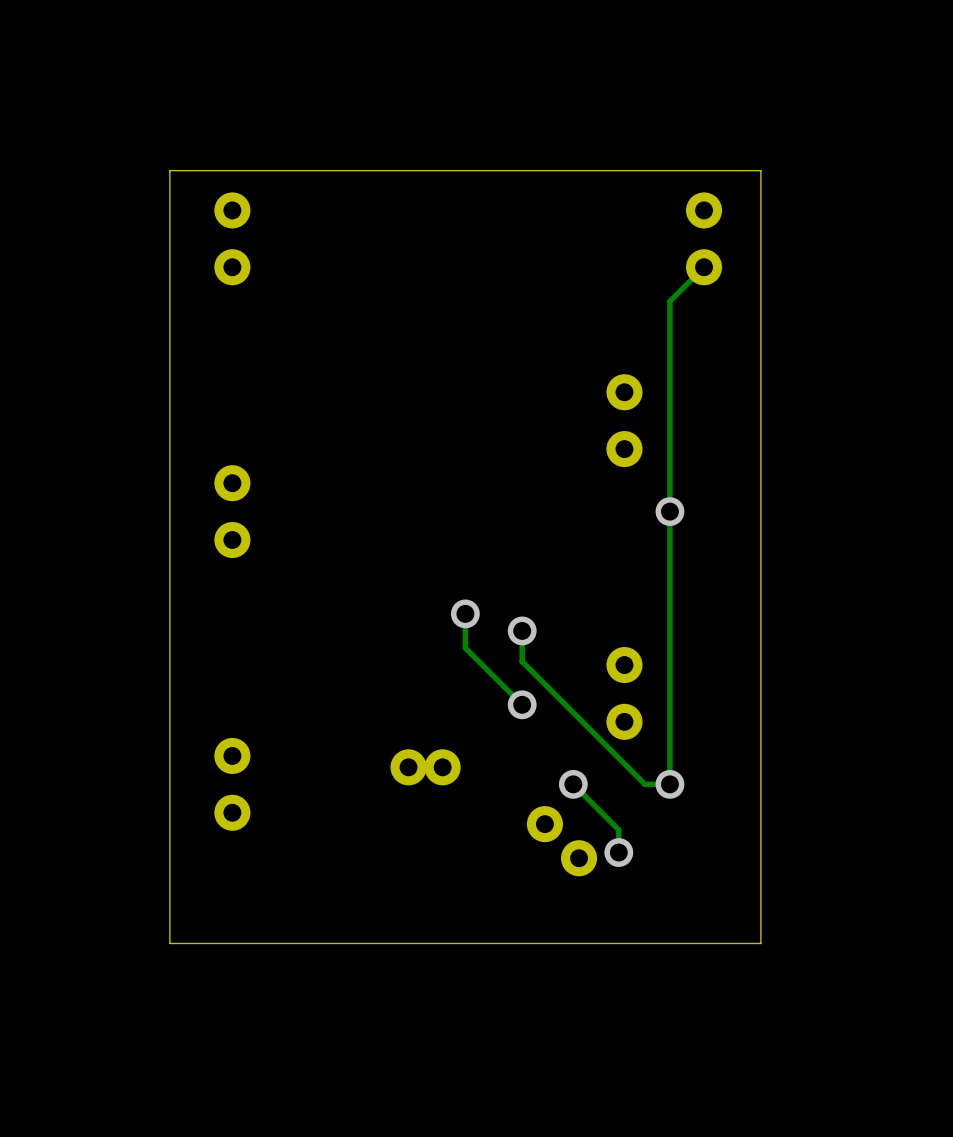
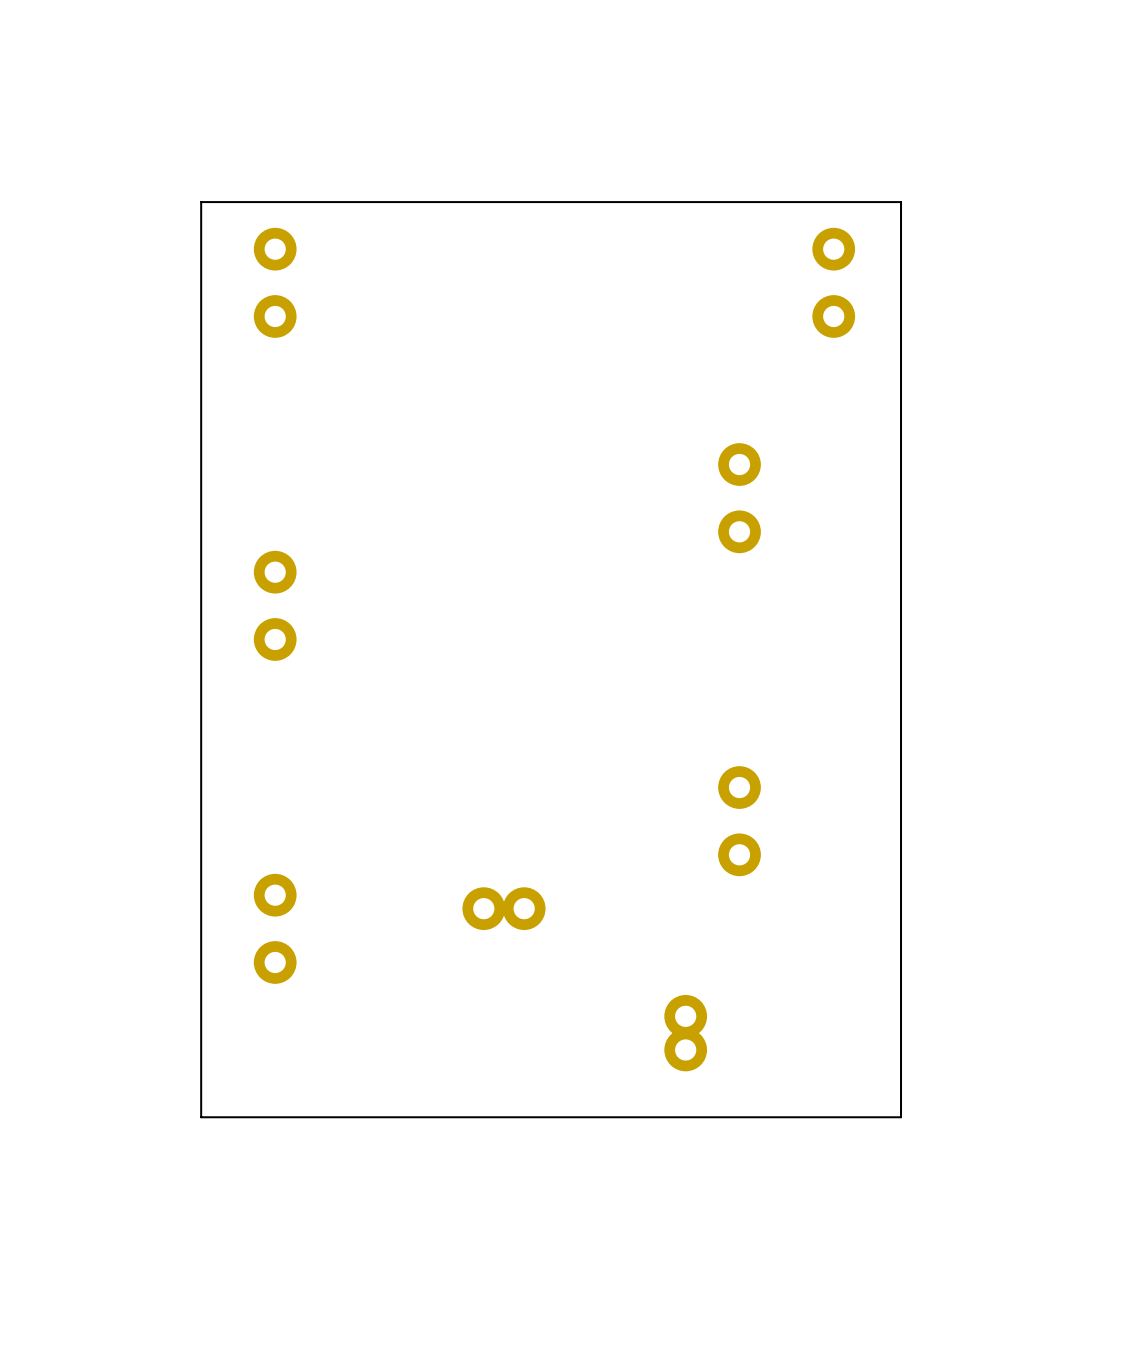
track: (704, 267) (669, 301) (669, 784) (645, 784) (522, 661) (522, 630) -> none
via: (669, 511) -> none
track: (465, 613) (465, 647) (522, 704) -> none
via: (465, 613) -> none
via: (522, 630) -> none
via: (522, 704) -> none
track: (573, 784) (618, 829) (618, 852) -> none
via: (573, 784) -> none
via: (669, 784) -> none
part position: (544, 824) -> (685, 1049)
via: (618, 852) -> none

